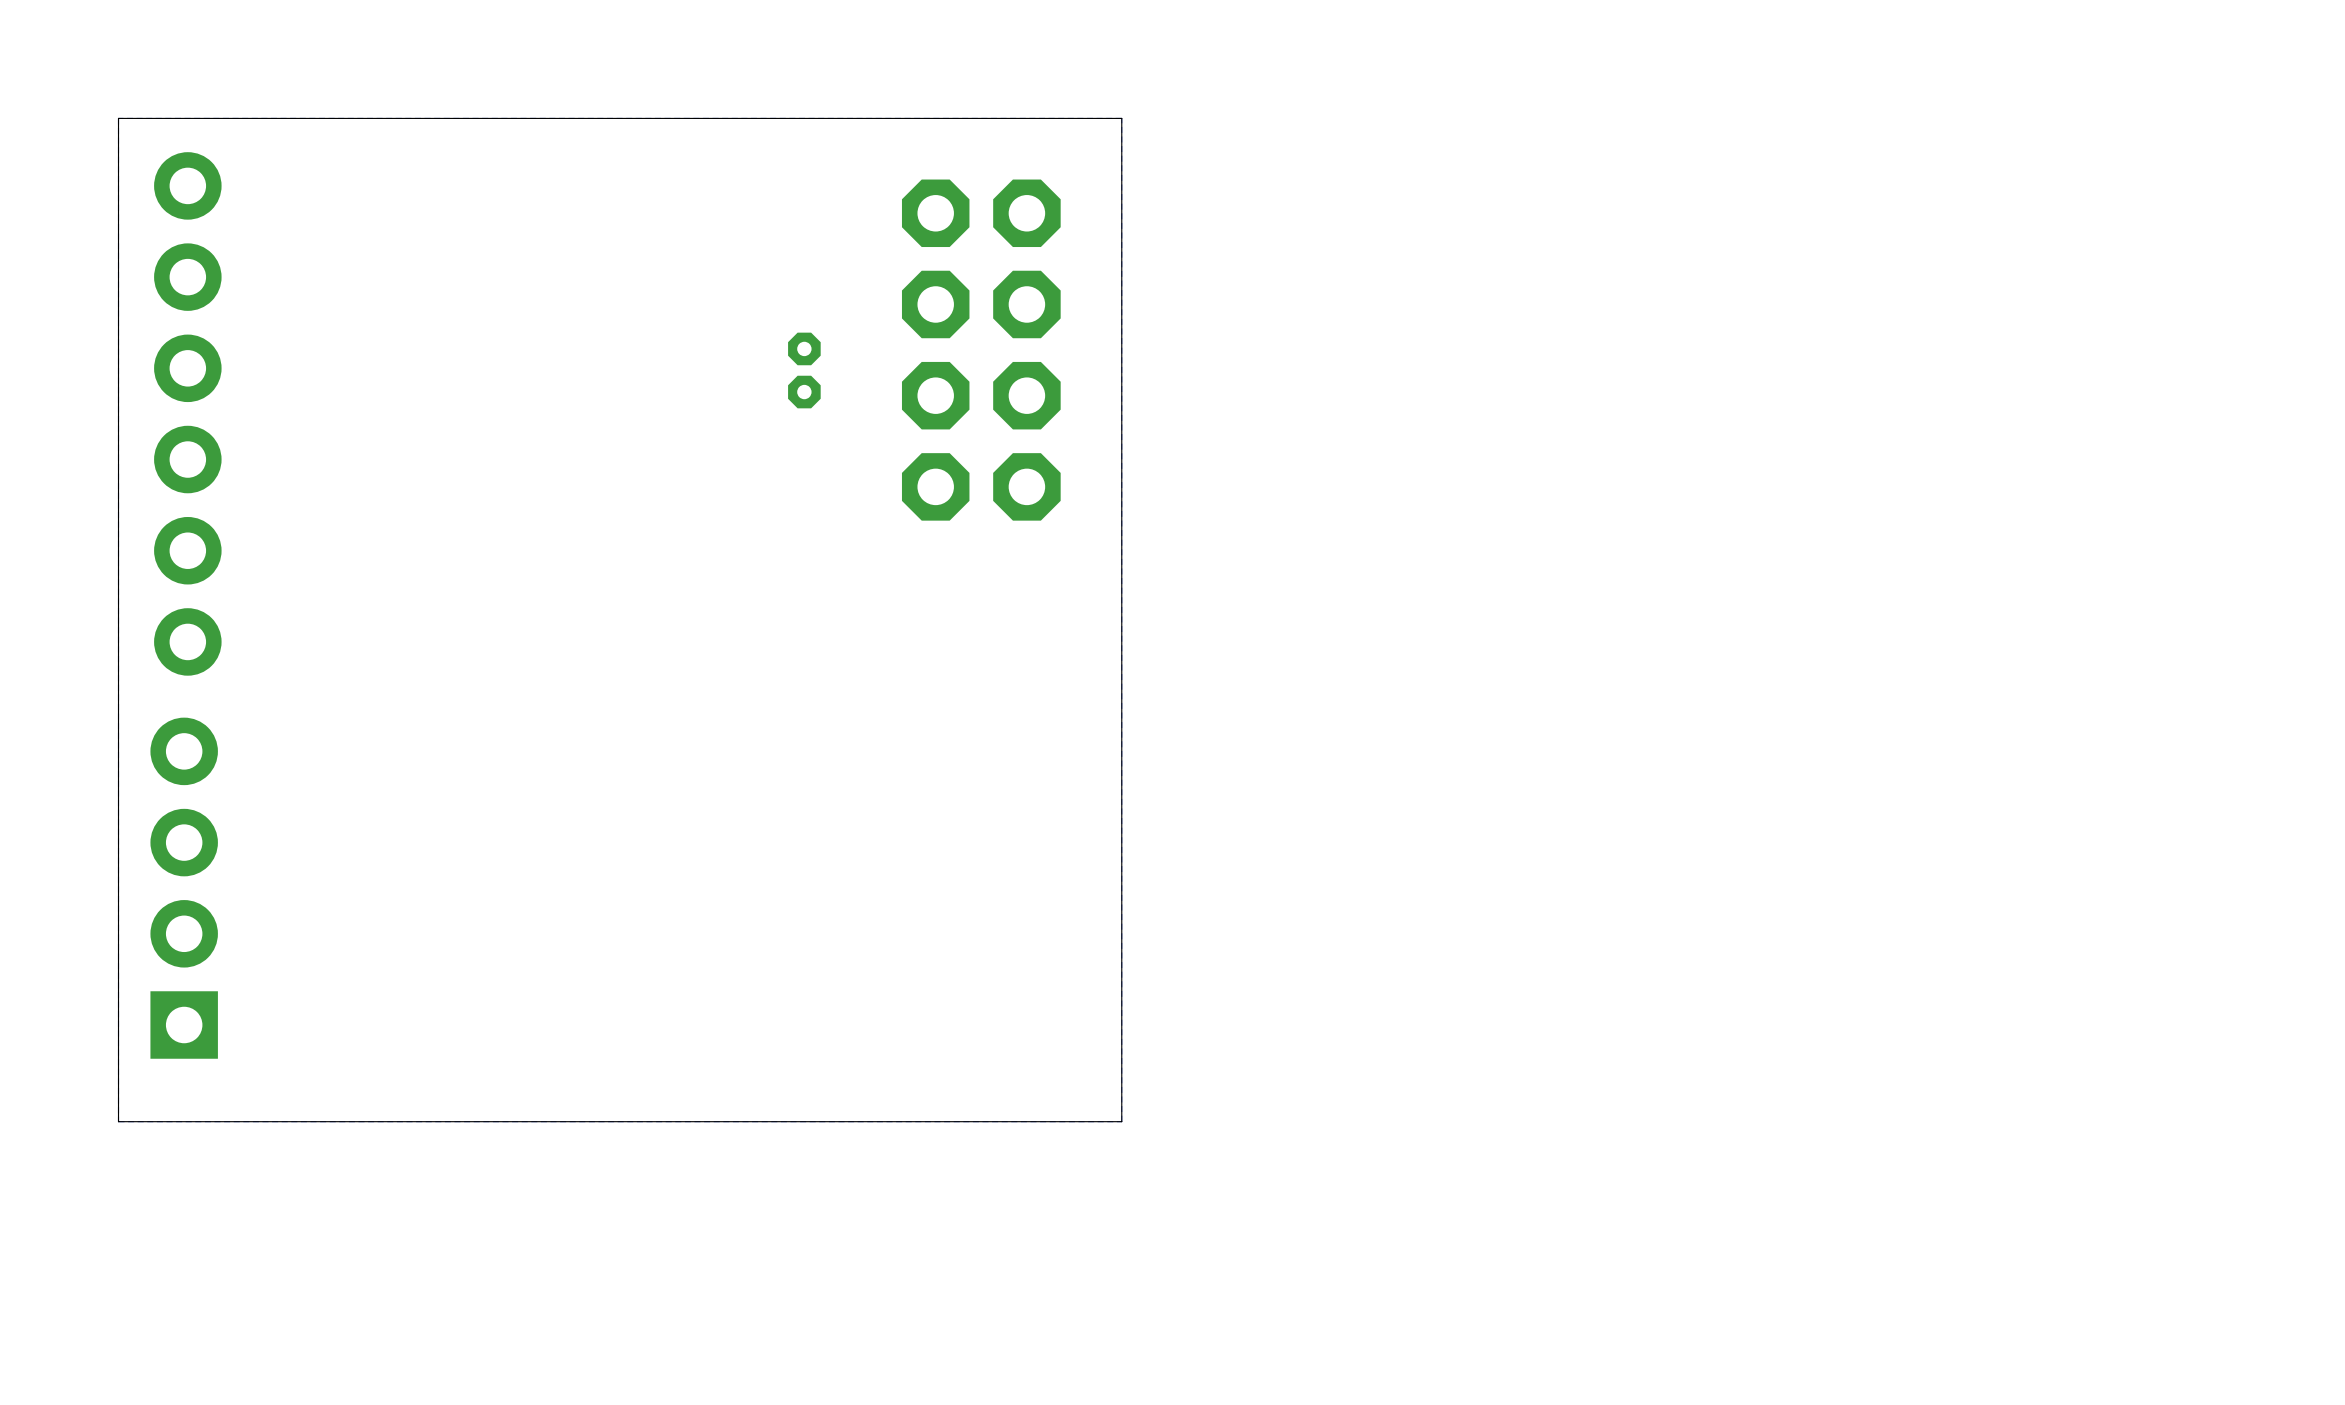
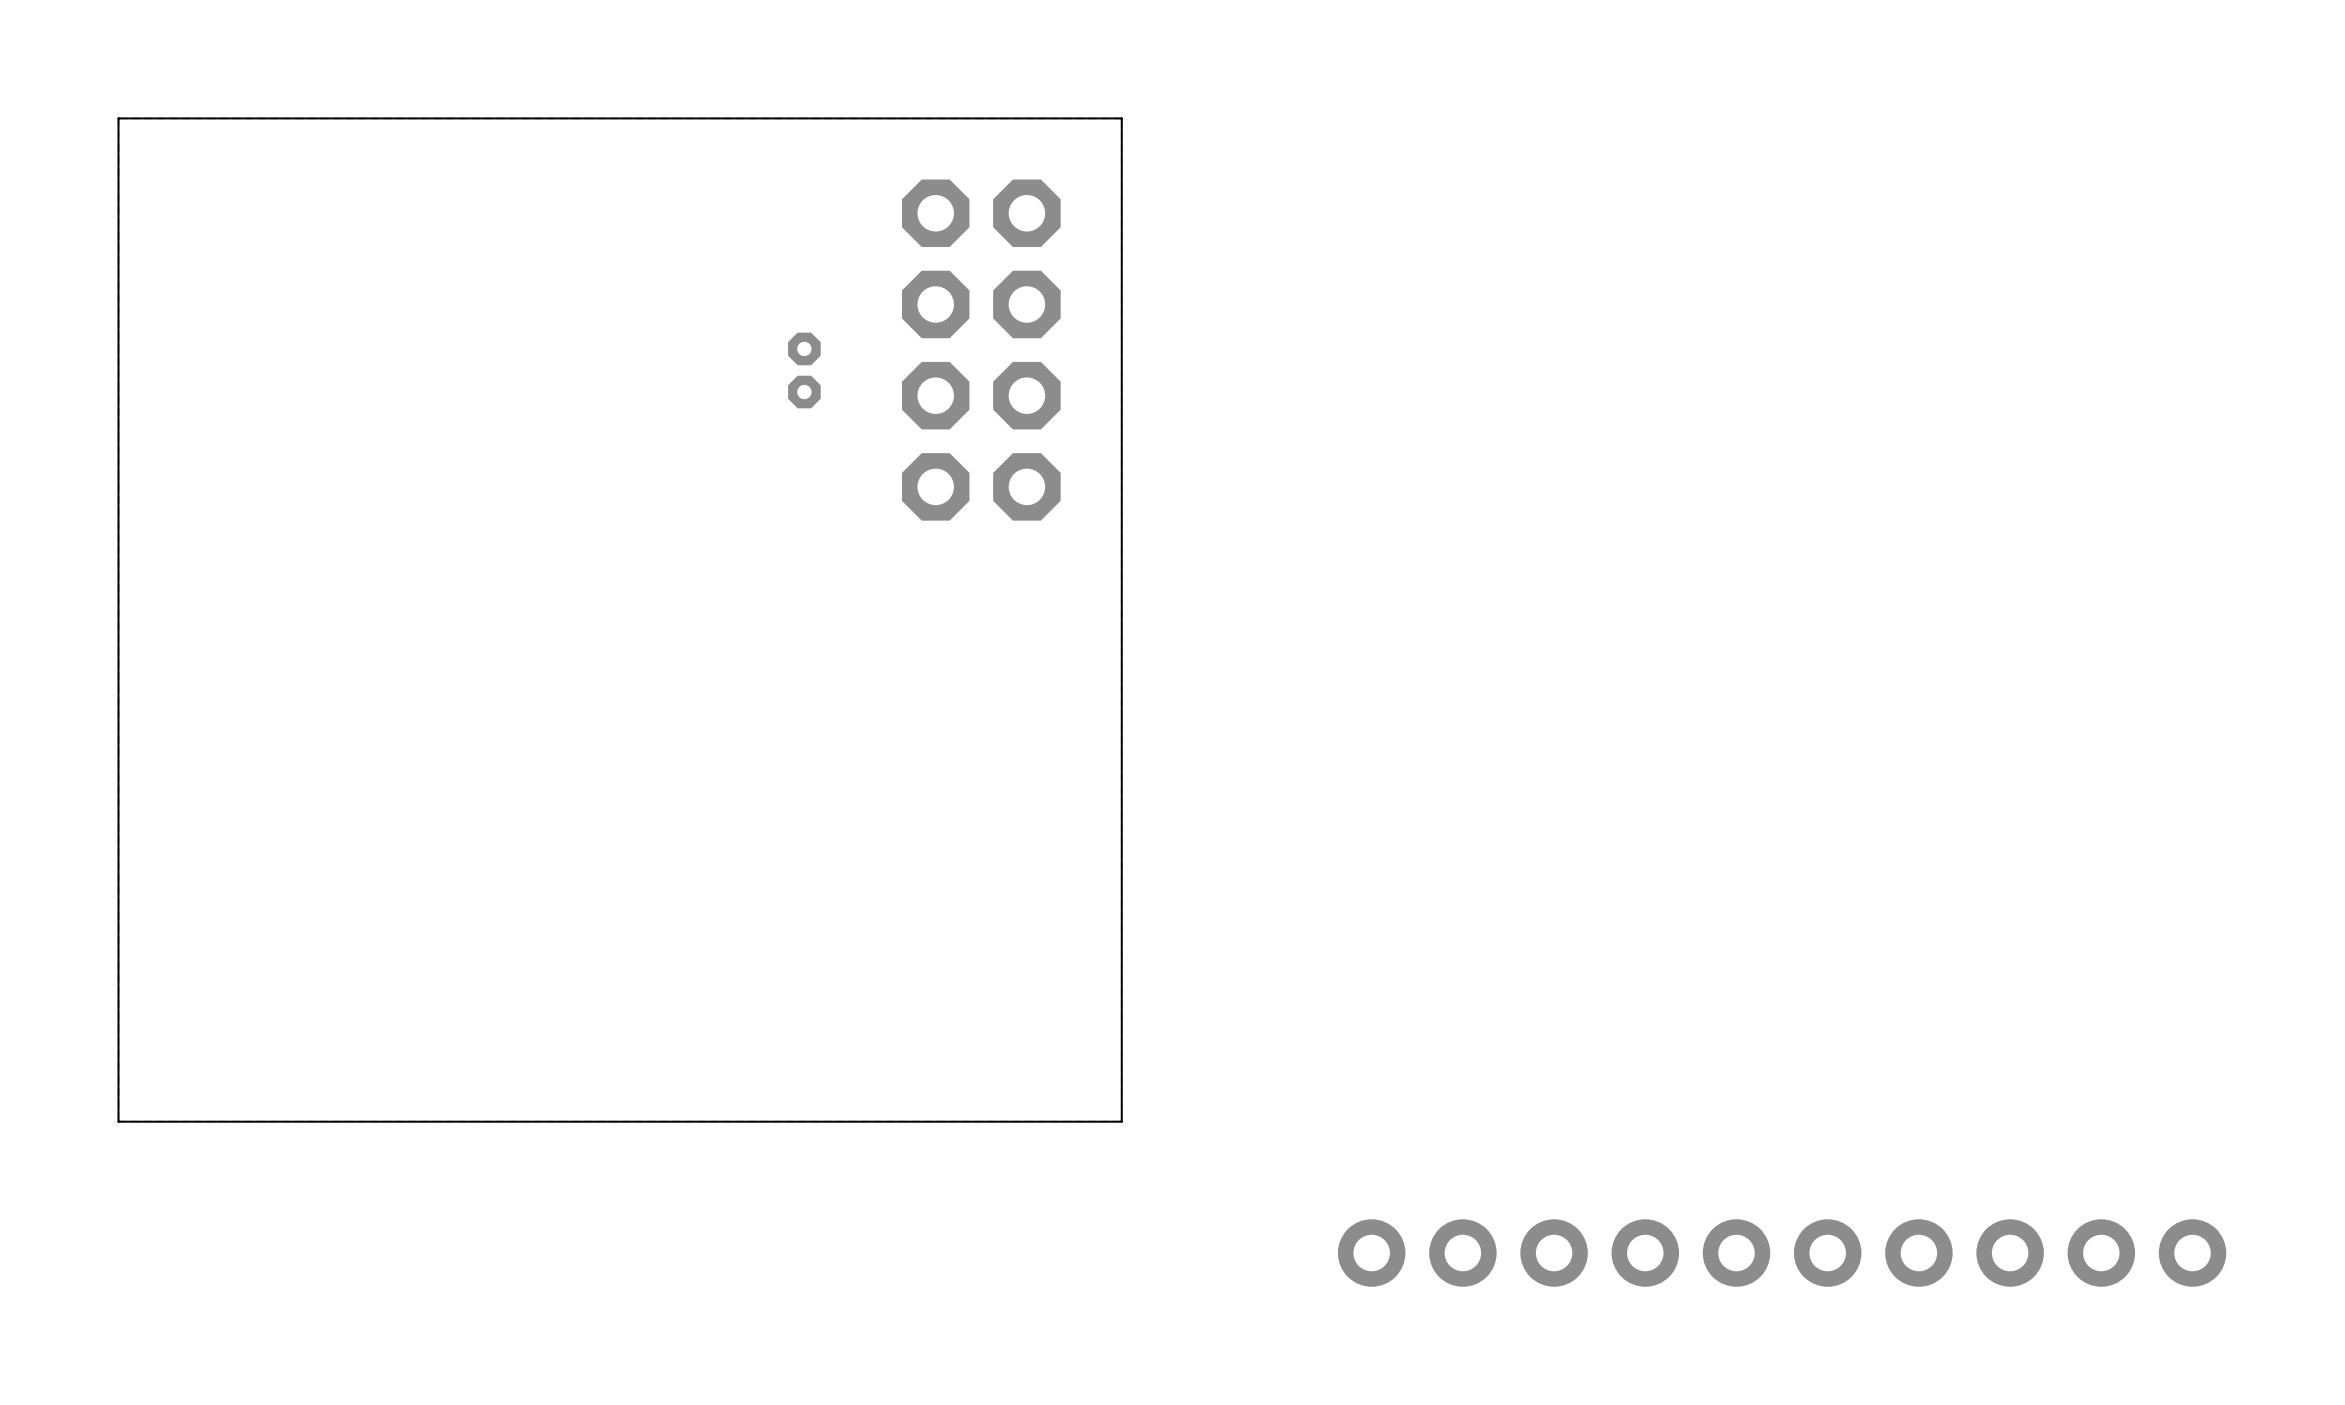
part: (187, 413) -> none
part: (184, 888) -> none
part: none -> (1782, 1253)

